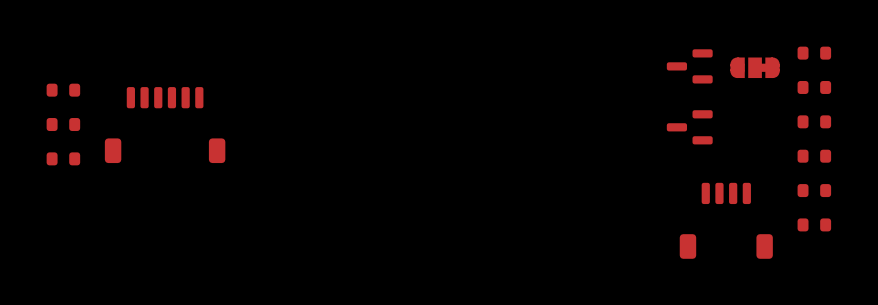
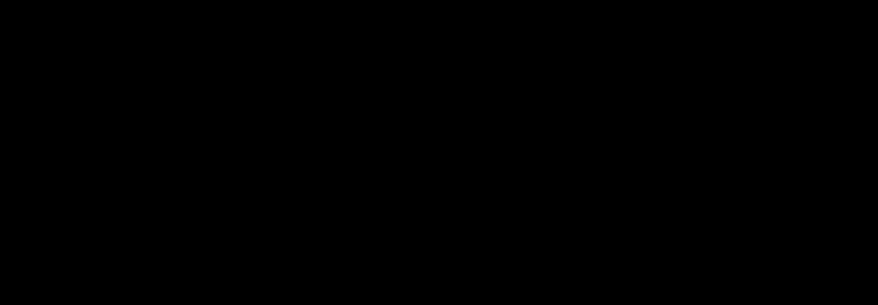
part: (814, 53) -> none
part: (689, 66) -> none
part: (755, 67) -> none
part: (814, 87) -> none
part: (63, 90) -> none
part: (814, 121) -> none
part: (63, 124) -> none
part: (165, 125) -> none
part: (689, 127) -> none
part: (814, 156) -> none
part: (63, 158) -> none
part: (814, 190) -> none
part: (726, 220) -> none
part: (814, 224) -> none

